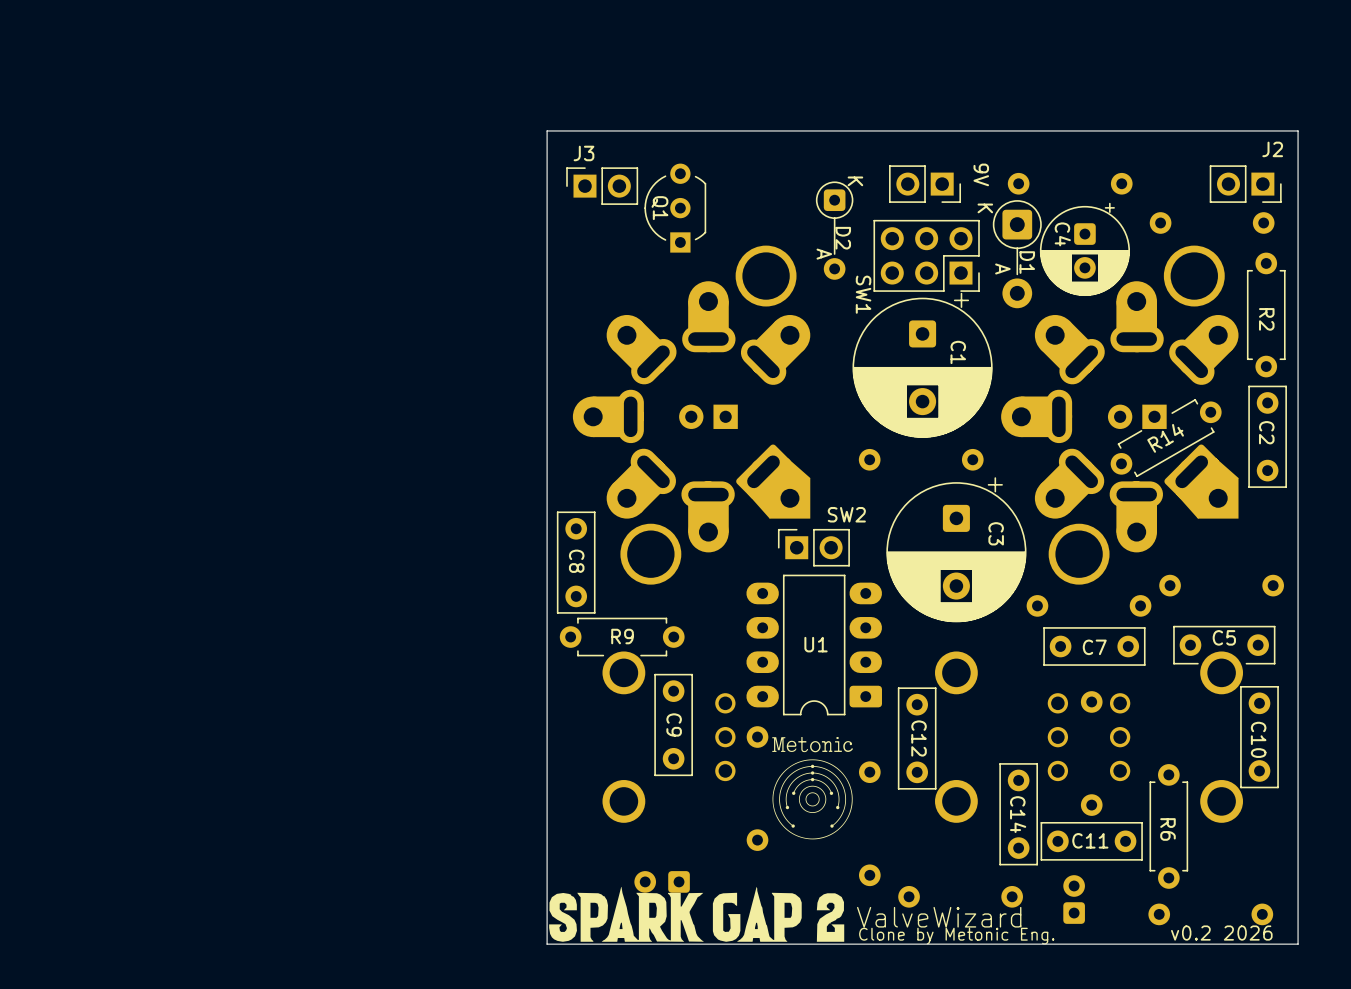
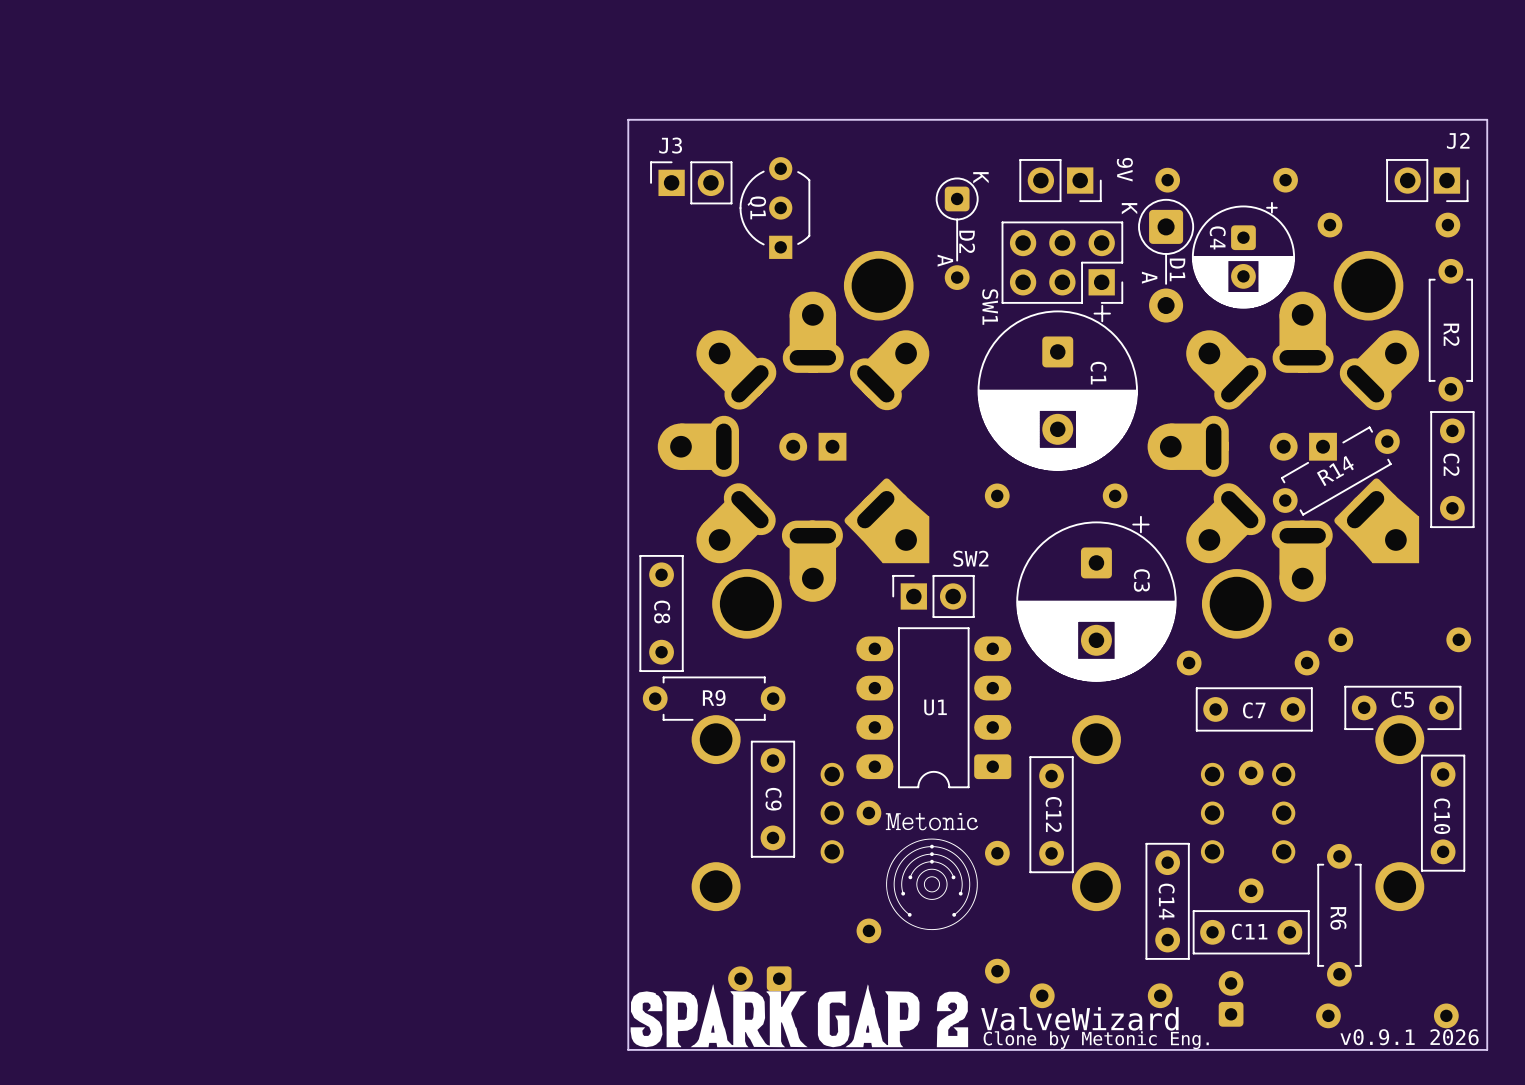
text: v0.2 2026 (1221, 933) -> v0.9.1 2026 (1409, 1037)

